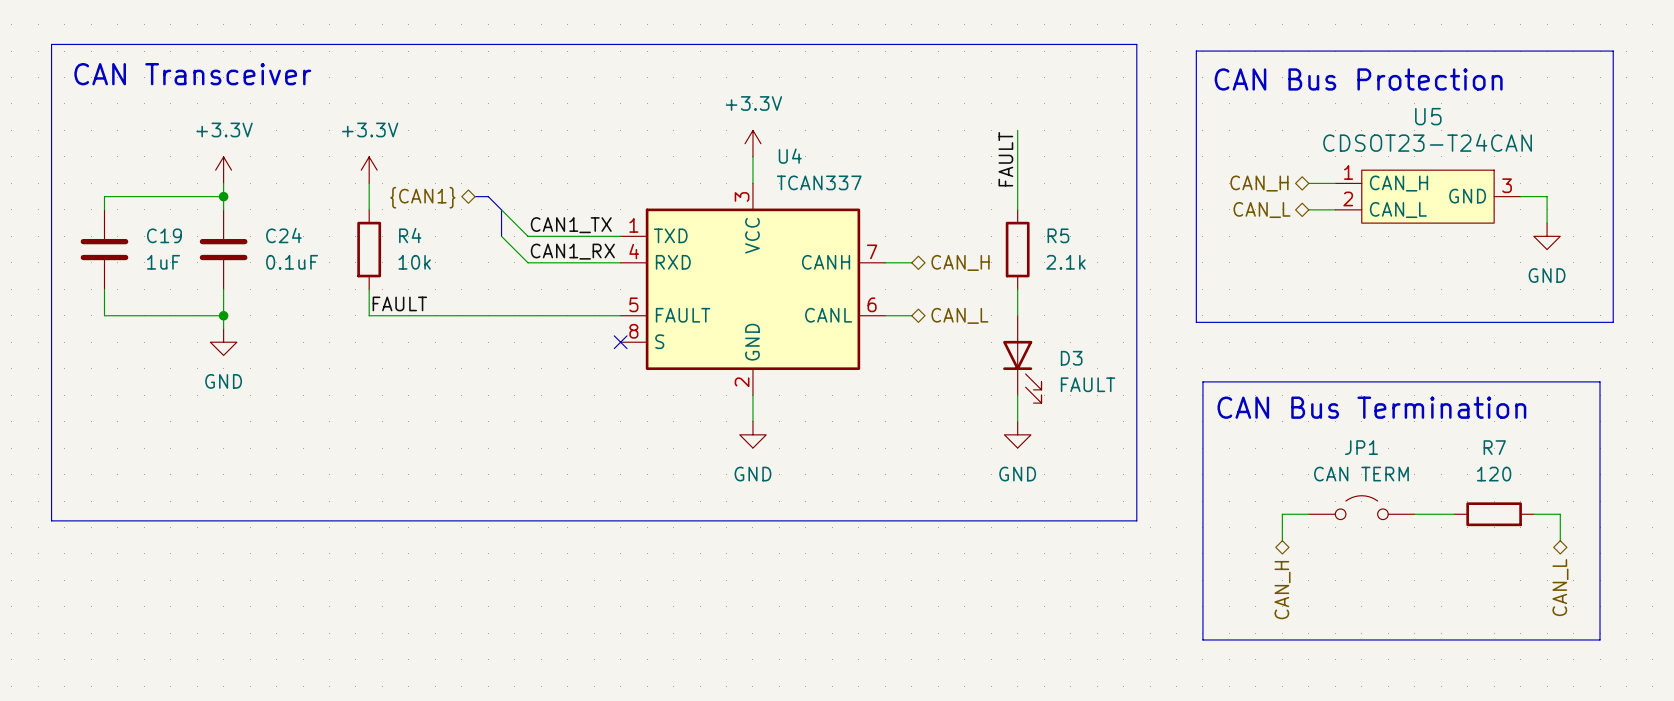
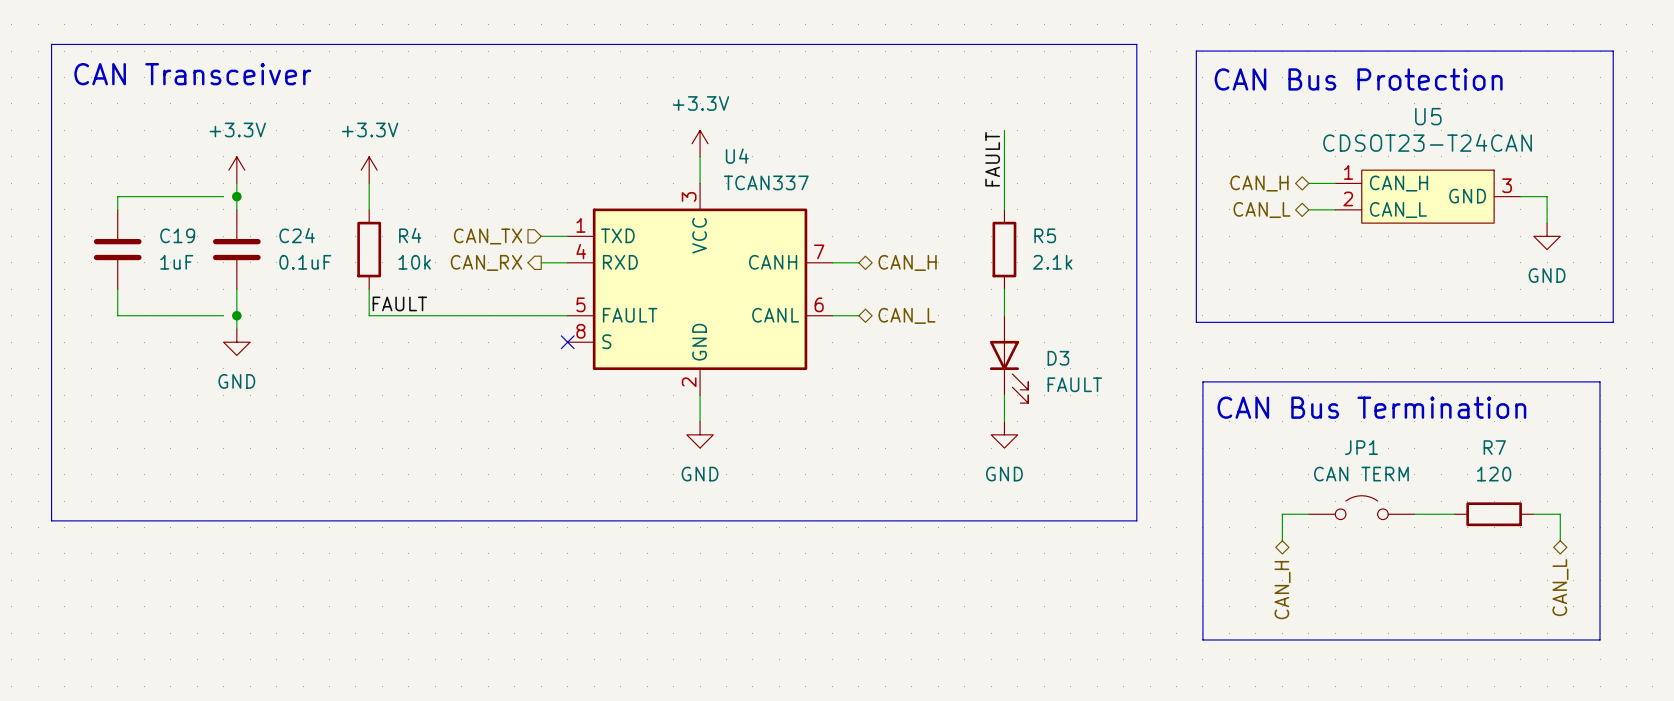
wire: (1017, 130) (1017, 209) -> (1004, 130) (1004, 209)
power symbol position: +3.3V (752, 143) -> +3.3V (700, 143)
wire: (752, 156) (752, 183) -> (700, 156) (700, 183)
label position: FAULT (1005, 159) -> FAULT (992, 159)
power symbol position: +3.3V (223, 170) -> +3.3V (236, 170)
wire: (223, 183) (223, 209) -> (236, 183) (236, 209)
wire: (117, 196) (104, 196) (104, 209) -> (117, 196) (117, 209)
junction position: (223, 196) -> (236, 196)
bus: (475, 196) (488, 196) (501, 209) (501, 236) -> none
hierarchical label: {CAN1} (422, 197) -> none
wire: (501, 209) (528, 236) (541, 236) -> none
label: CAN1_TX (571, 225) -> none
hierarchical label: none -> CAN_TX (488, 236)
wire: (501, 236) (528, 262) (541, 262) -> none
C19 position: (104, 249) -> (117, 249)
C24 position: (223, 249) -> (236, 249)
R5 position: (1017, 249) -> (1004, 249)
label: CAN1_RX (572, 251) -> none
hierarchical label: none -> CAN_RX (486, 262)
hierarchical label position: CAN_H (960, 262) -> CAN_H (907, 262)
wire: (104, 289) (104, 315) (117, 315) -> (117, 289) (117, 315)
wire: (223, 289) (223, 328) -> (236, 289) (236, 328)
U4 position: (752, 289) -> (700, 289)
wire: (1017, 289) (1017, 315) -> (1004, 289) (1004, 315)
junction position: (223, 315) -> (236, 315)
hierarchical label position: CAN_L (959, 315) -> CAN_L (906, 315)
power symbol position: GND (223, 342) -> GND (236, 342)
no-connect mark position: (620, 342) -> (567, 342)
D3 position: (1022, 359) -> (1009, 359)
wire: (752, 395) (752, 421) -> (700, 395) (700, 421)
wire: (1017, 395) (1017, 421) -> (1004, 395) (1004, 421)
power symbol position: GND (752, 434) -> GND (700, 434)
power symbol position: GND (1017, 434) -> GND (1004, 434)

